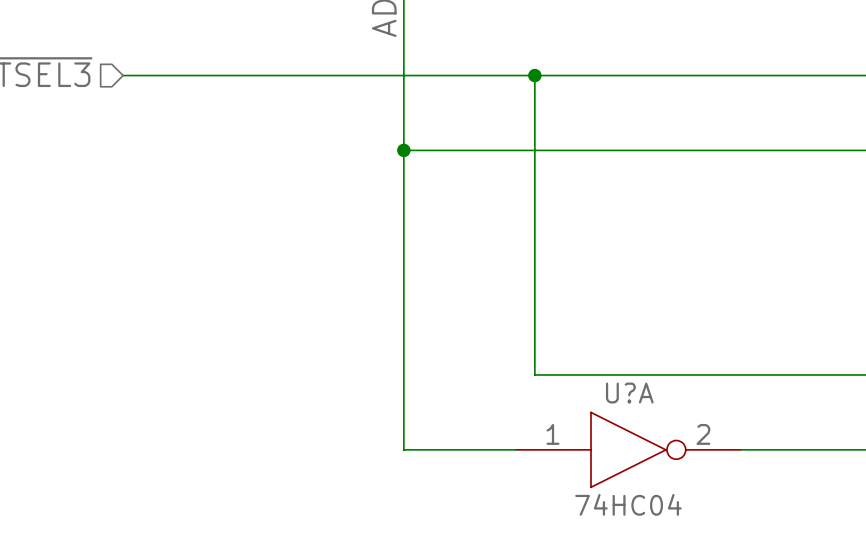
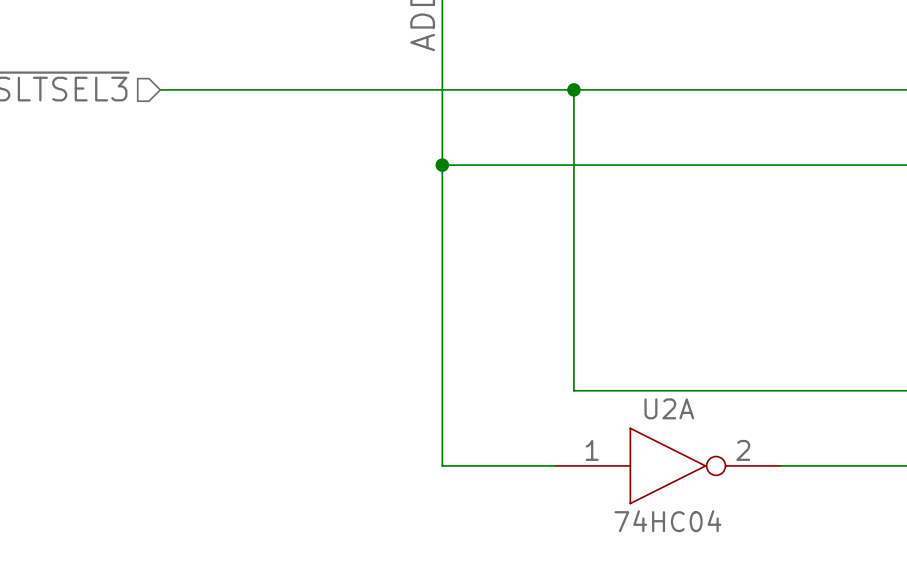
U?A name: U?A (629, 393) -> U2A (669, 408)

